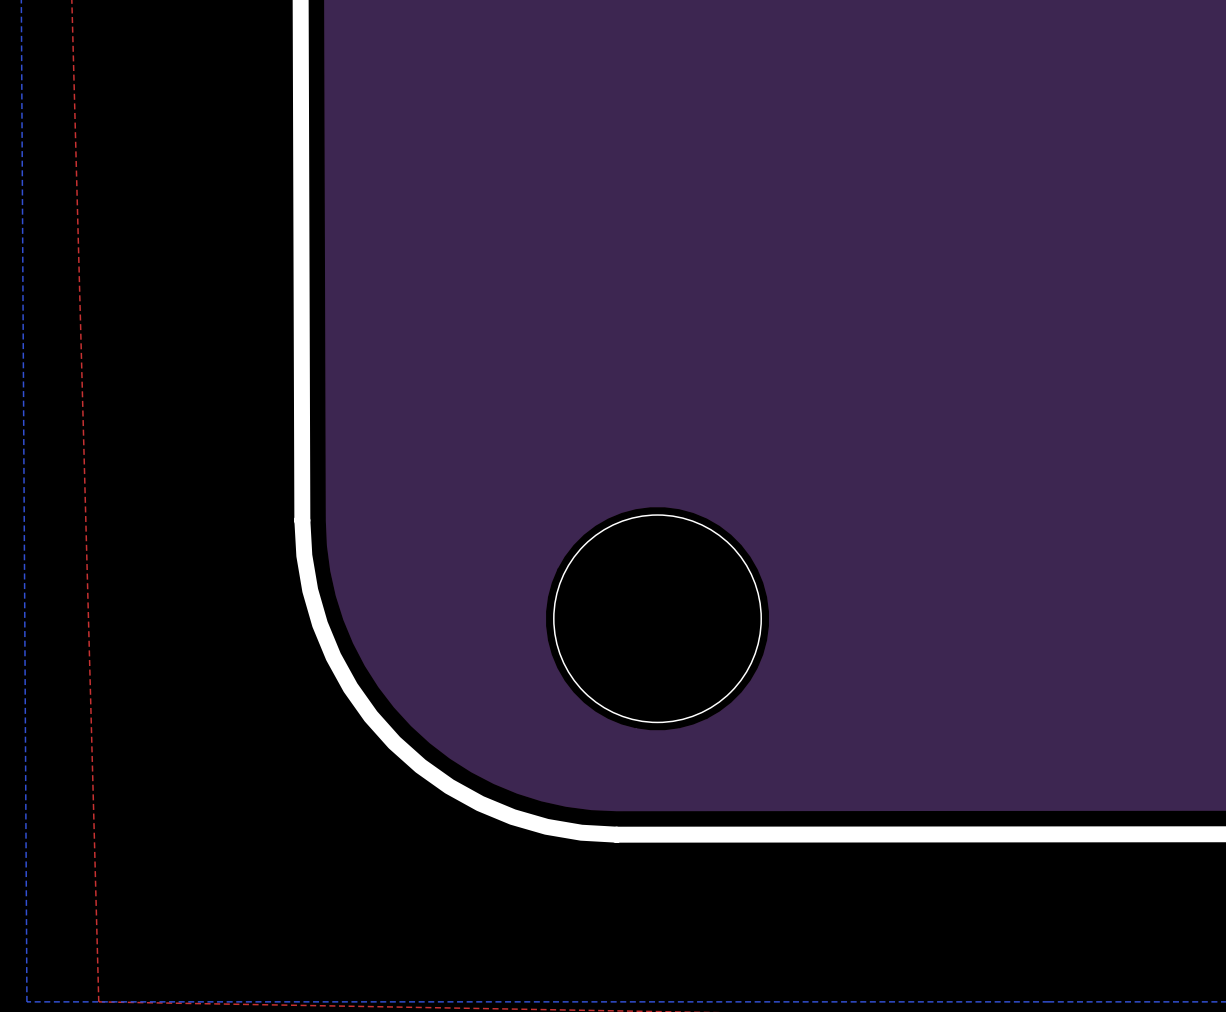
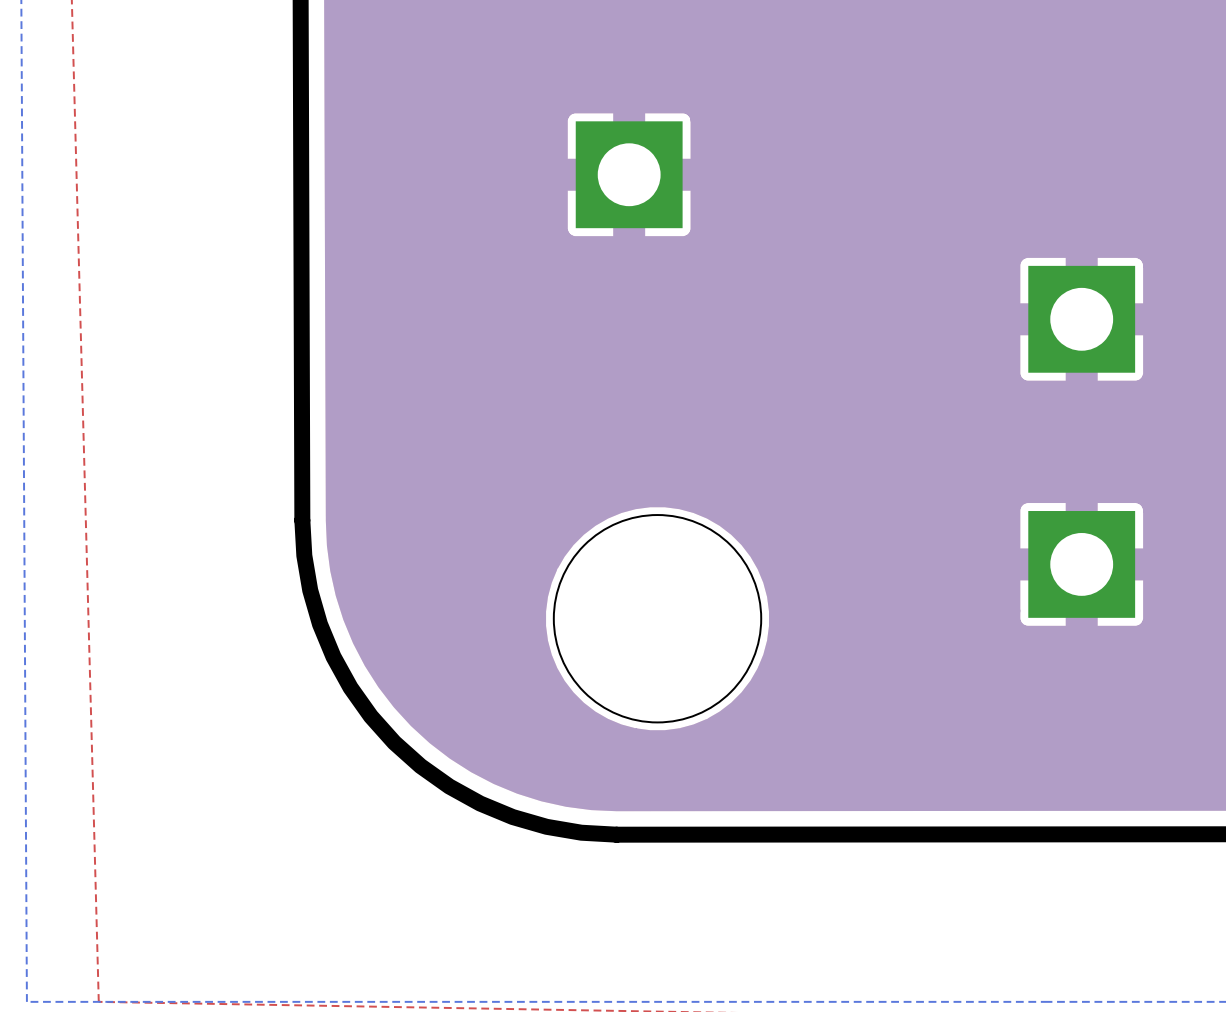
part: none -> (629, 174)
part: none -> (1081, 319)
part: none -> (1081, 564)

